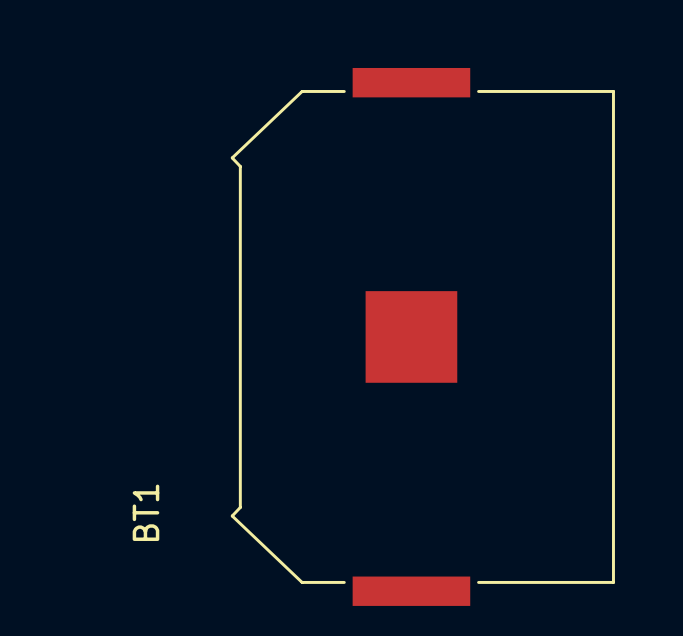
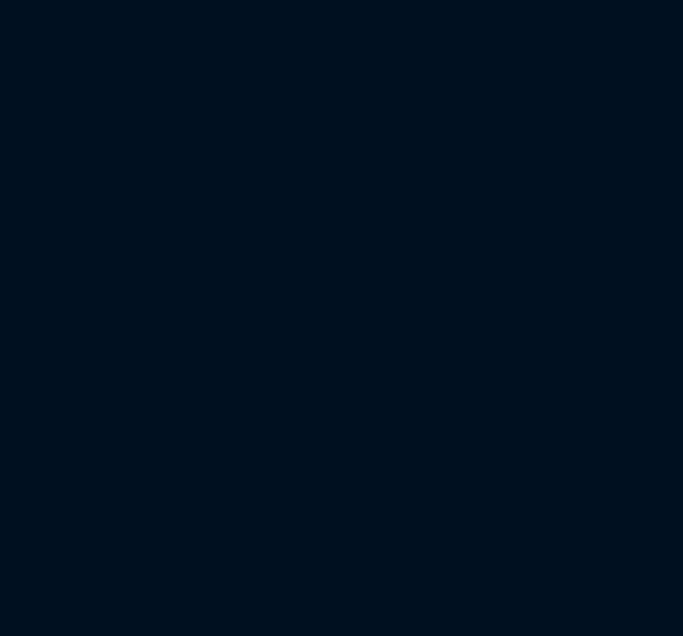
BT1: (422, 336) -> none

